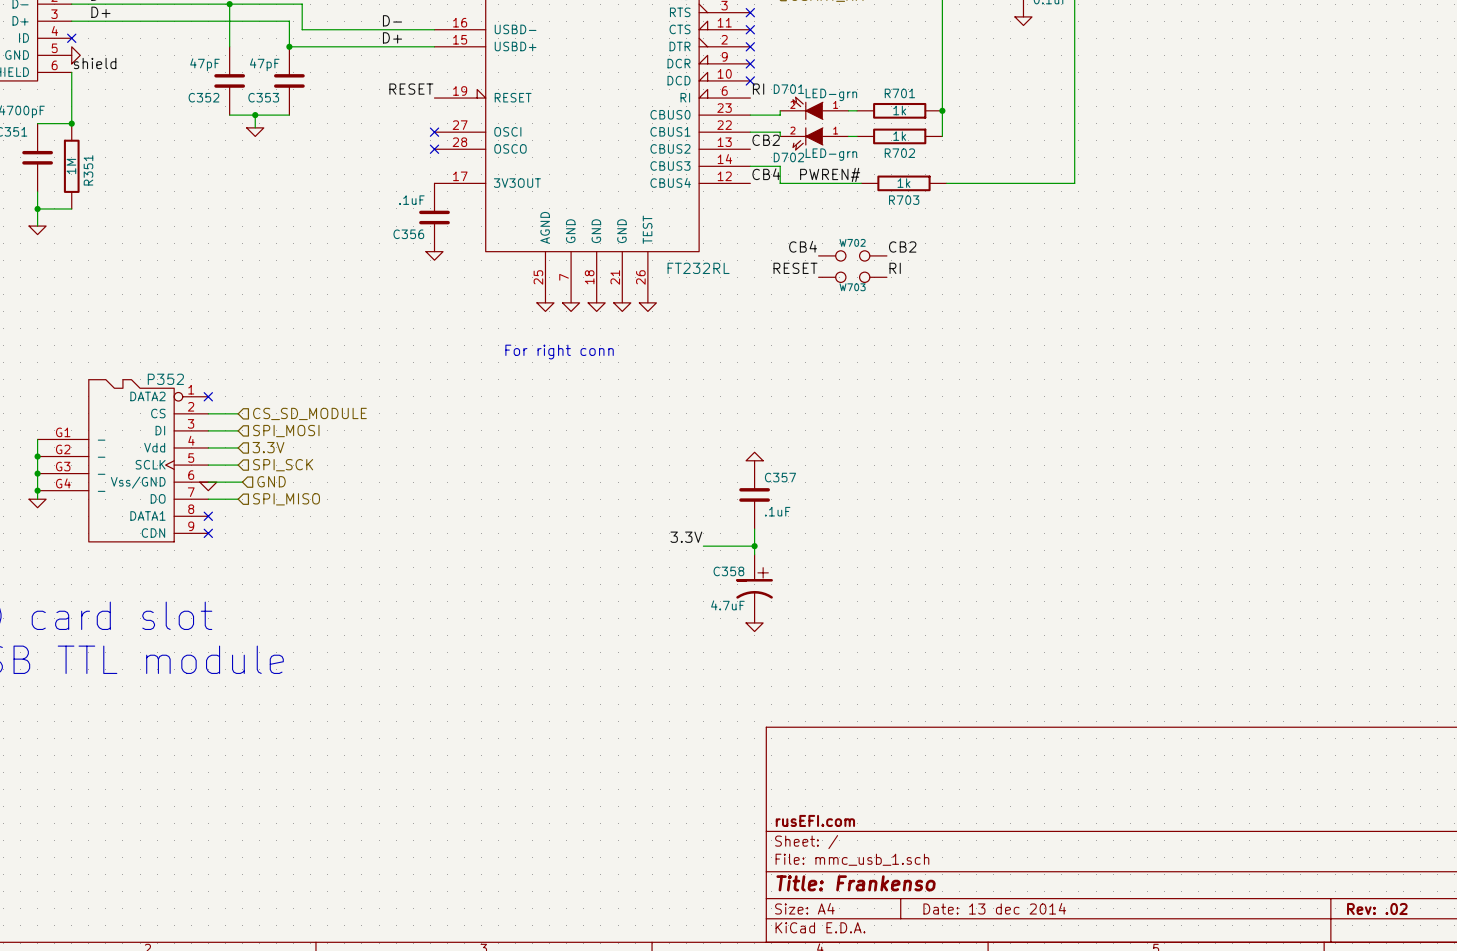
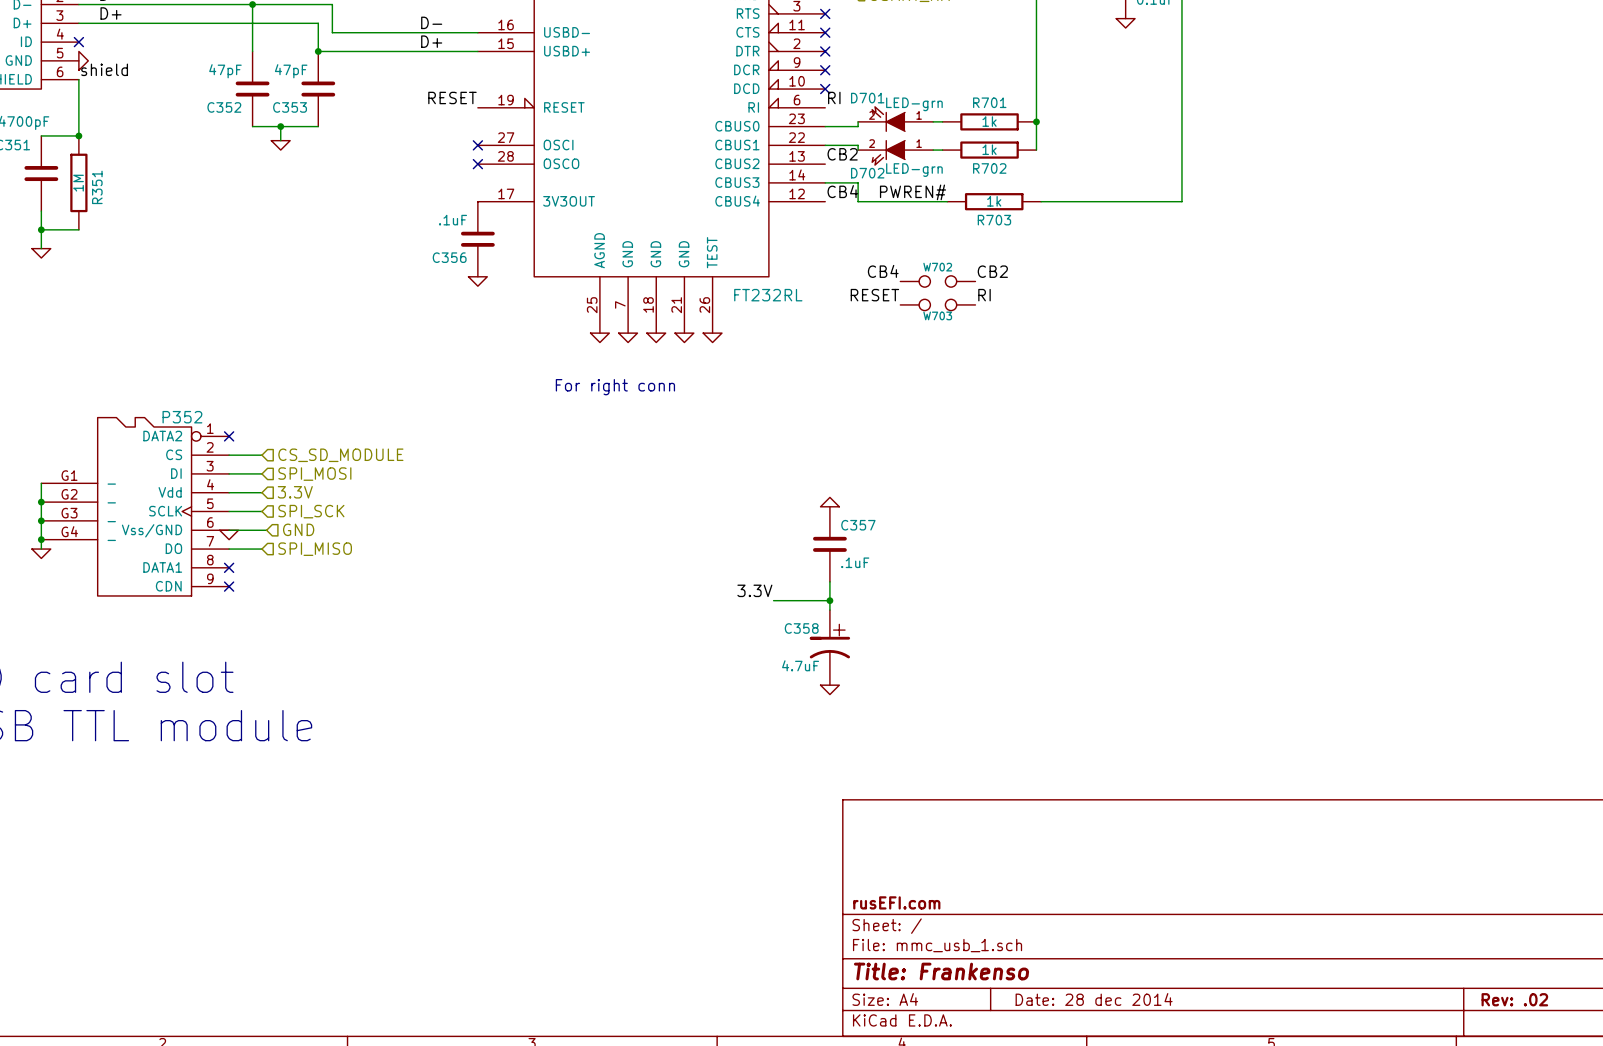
title block: Date: 13 dec 2014 (994, 908) -> Date: 28 dec 2014 (1094, 999)

